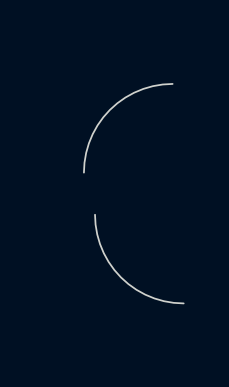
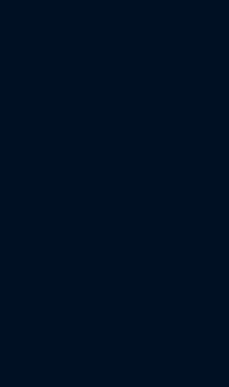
board edge: (172, 83) (143, 88) (125, 97) (109, 109) (97, 125) (88, 143) (83, 172) -> none
board edge: (95, 214) (97, 234) (103, 253) (120, 277) (136, 289) (154, 298) (183, 303) -> none

